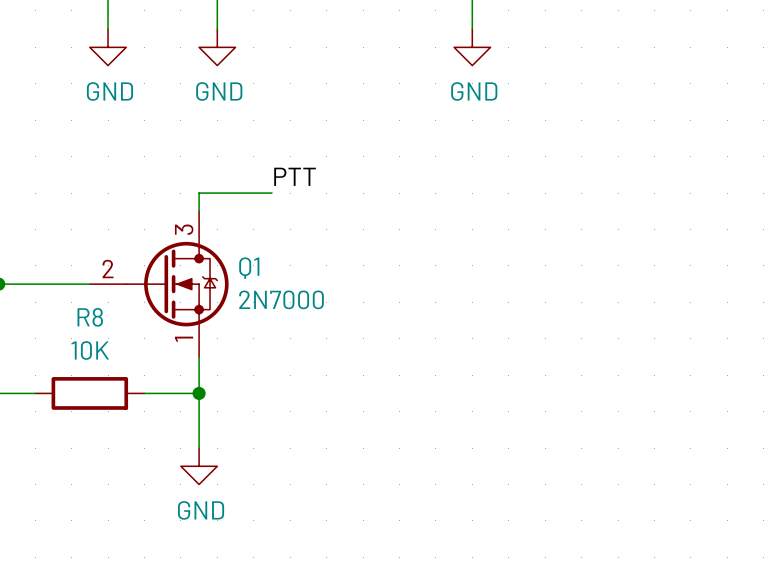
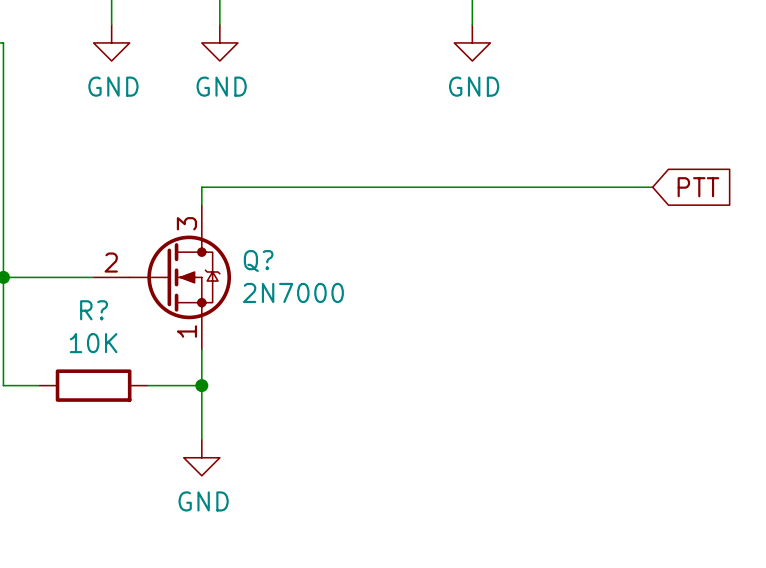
label: PTT (295, 176) -> none
wire: none -> (273, 187) (652, 187)
global label: none -> PTT (698, 187)
Q1 name: Q1 (249, 268) -> Q? (258, 261)
R8 name: R8 (90, 317) -> R? (94, 310)

